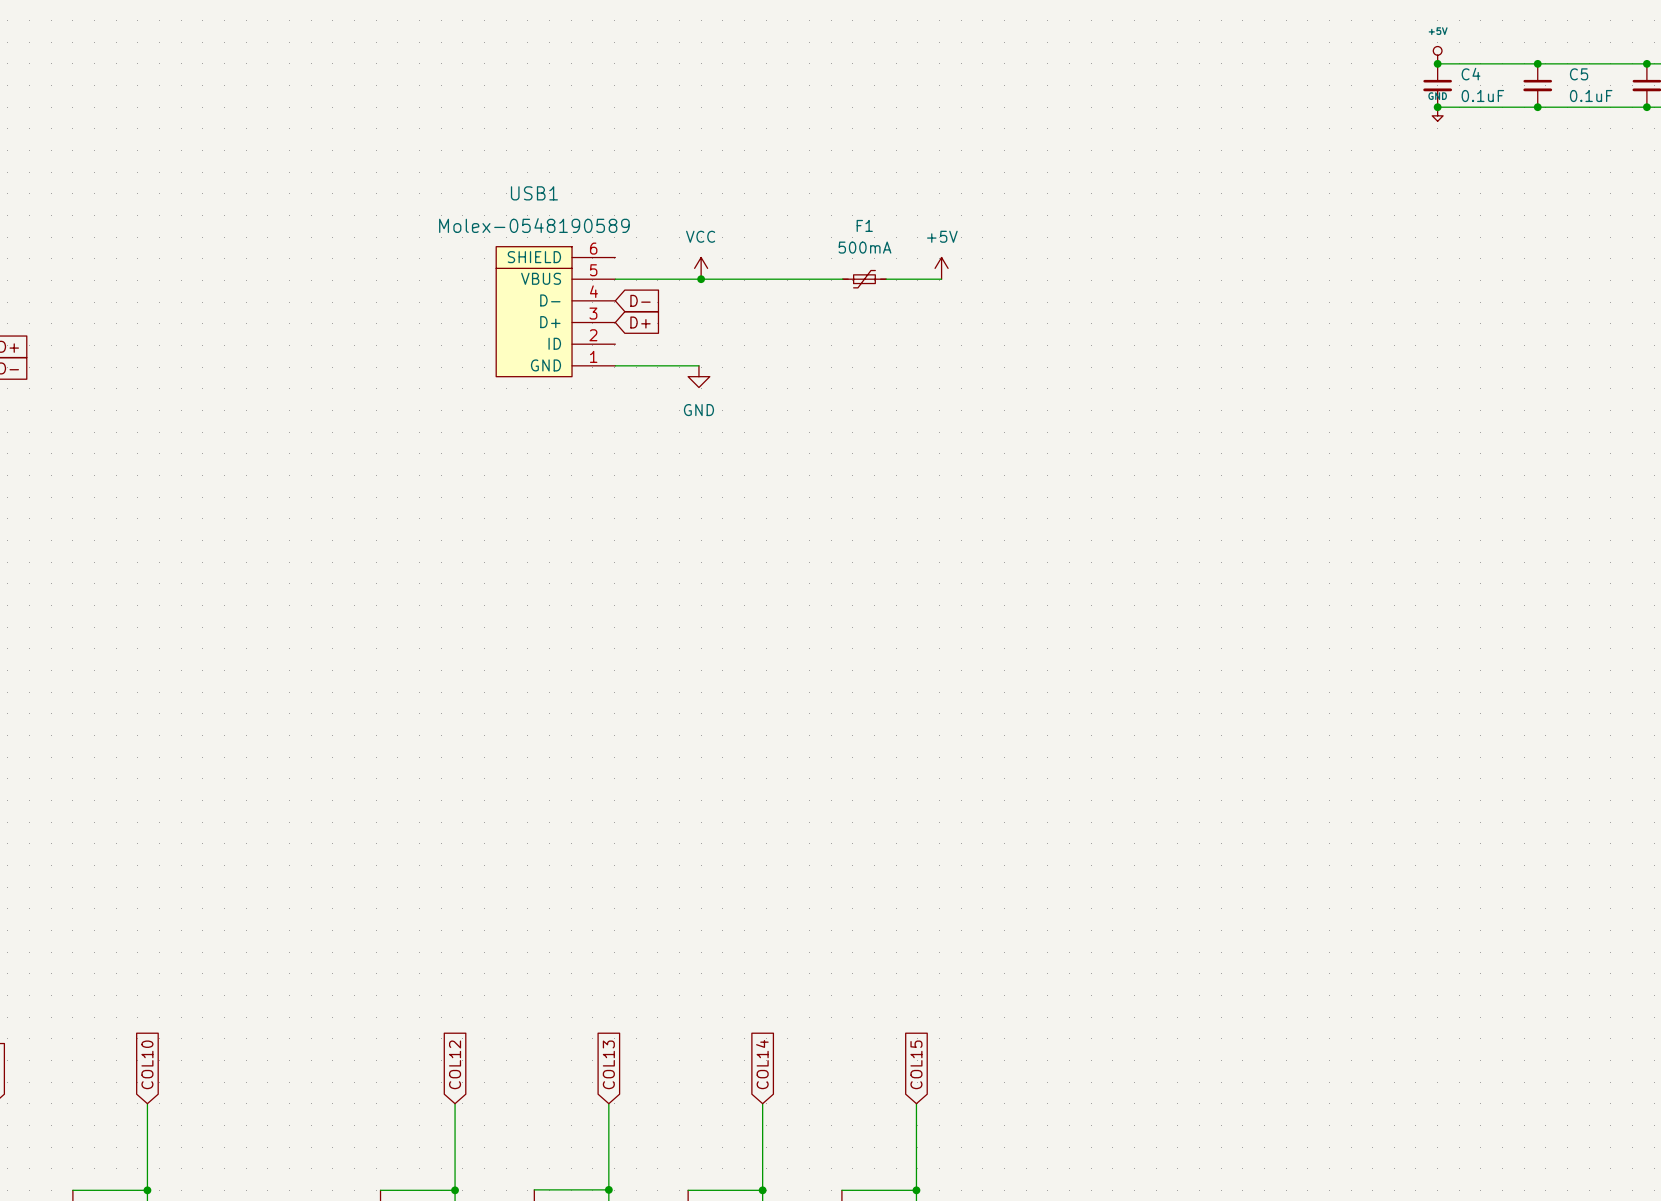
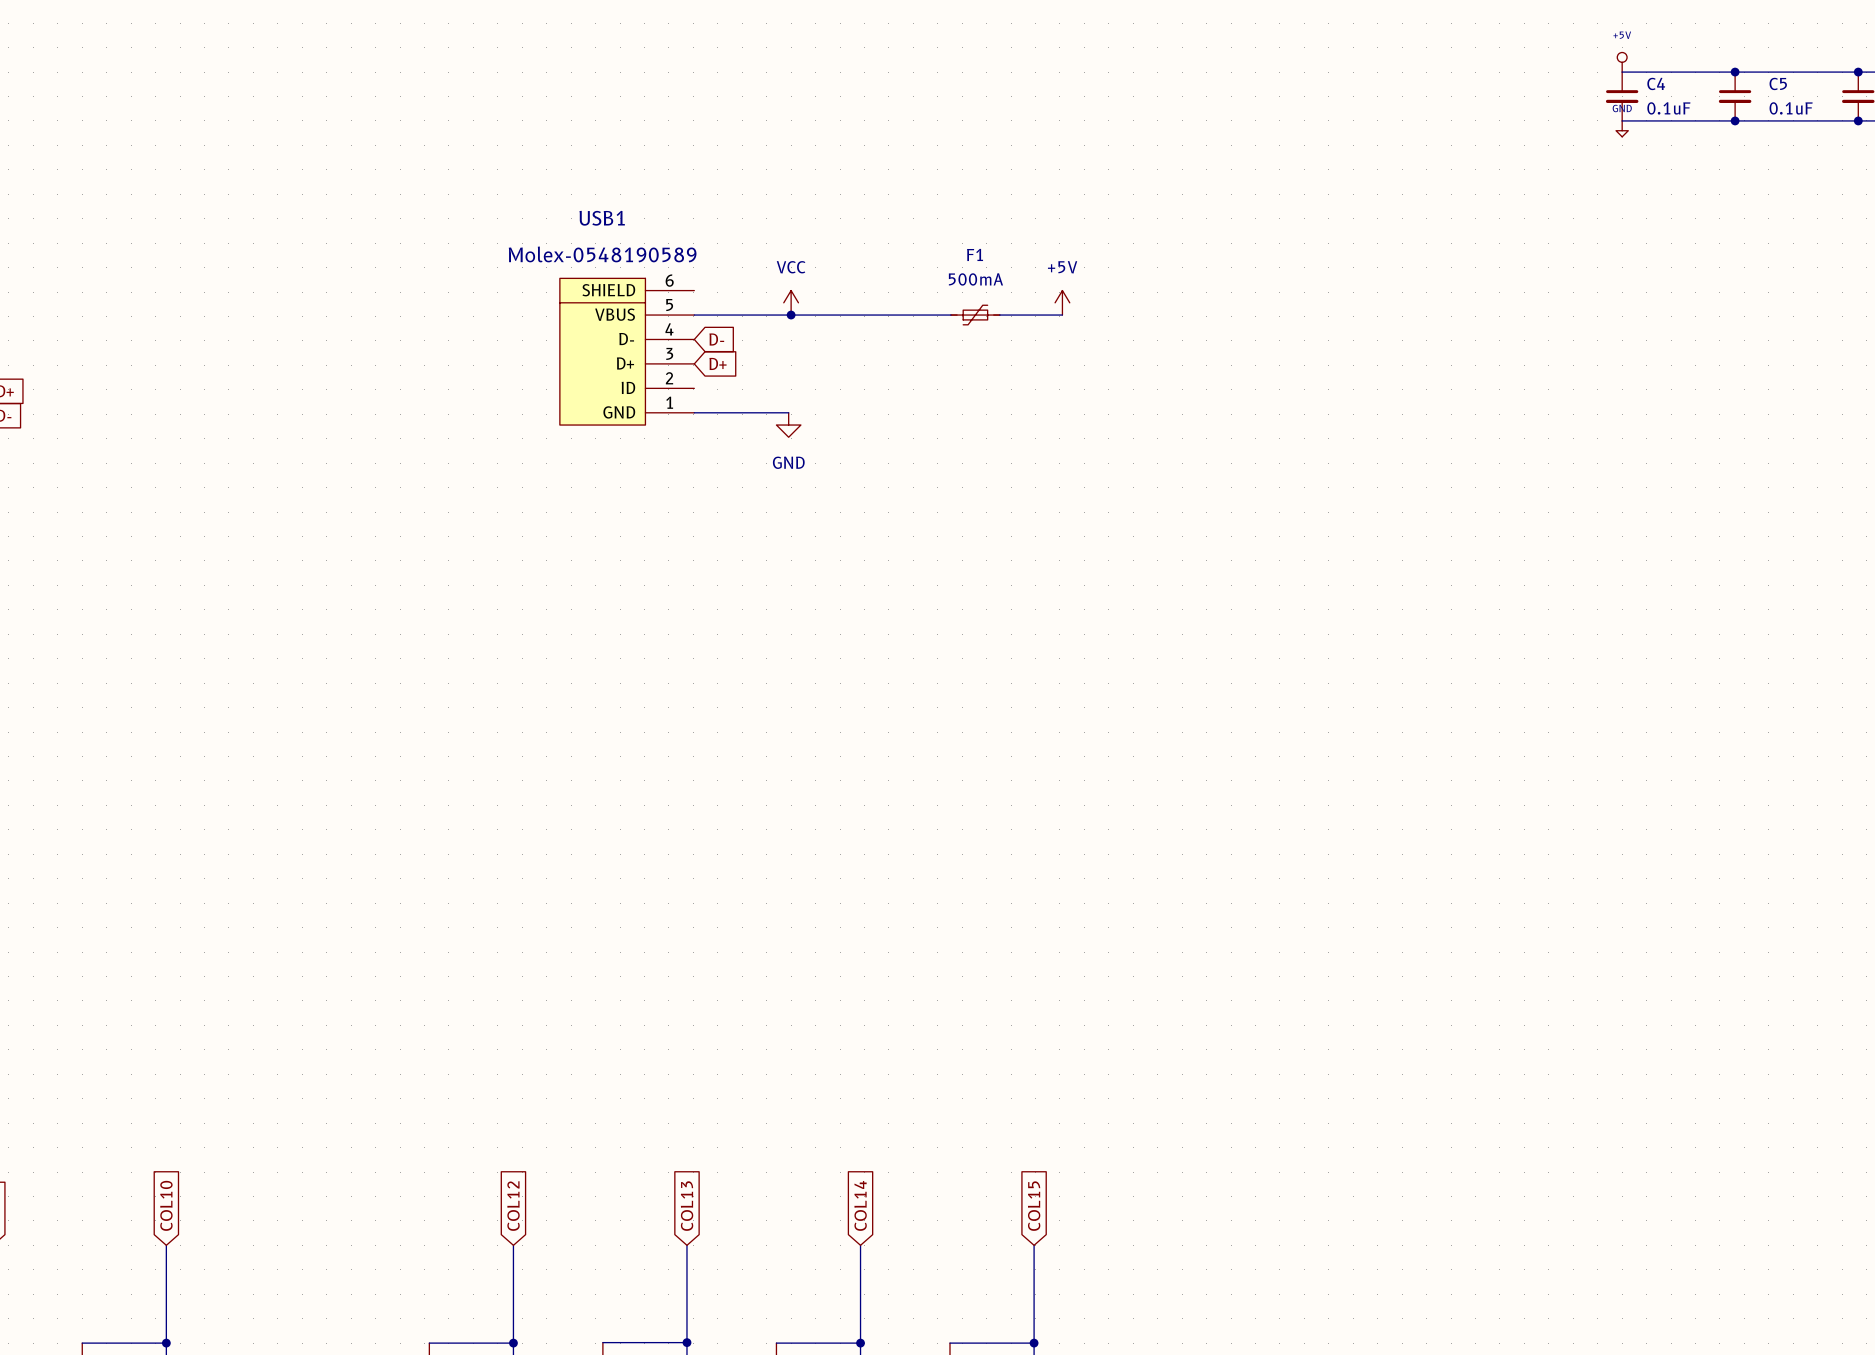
junction: (1437, 63) -> none
junction: (1437, 107) -> none

